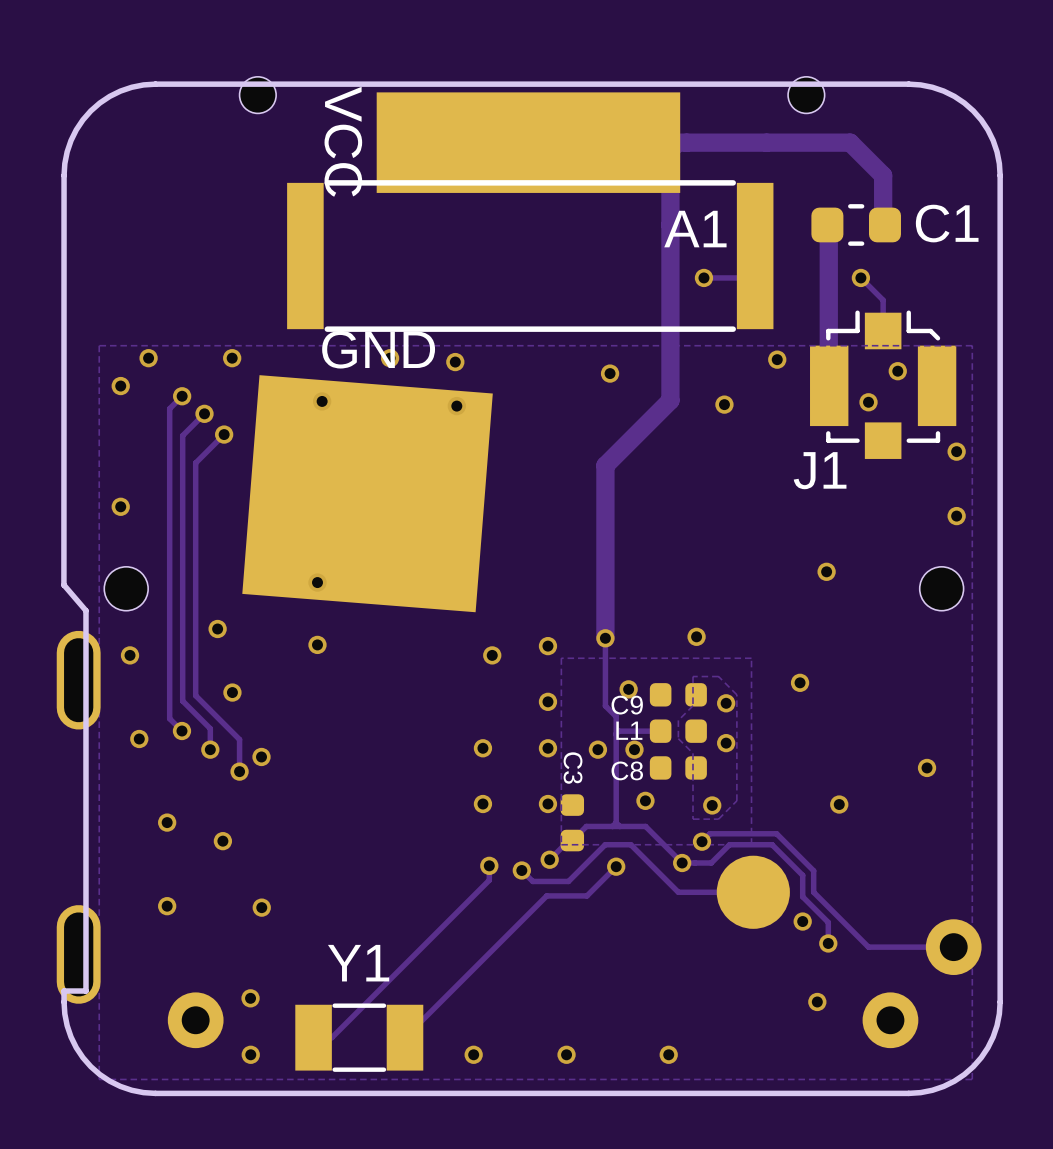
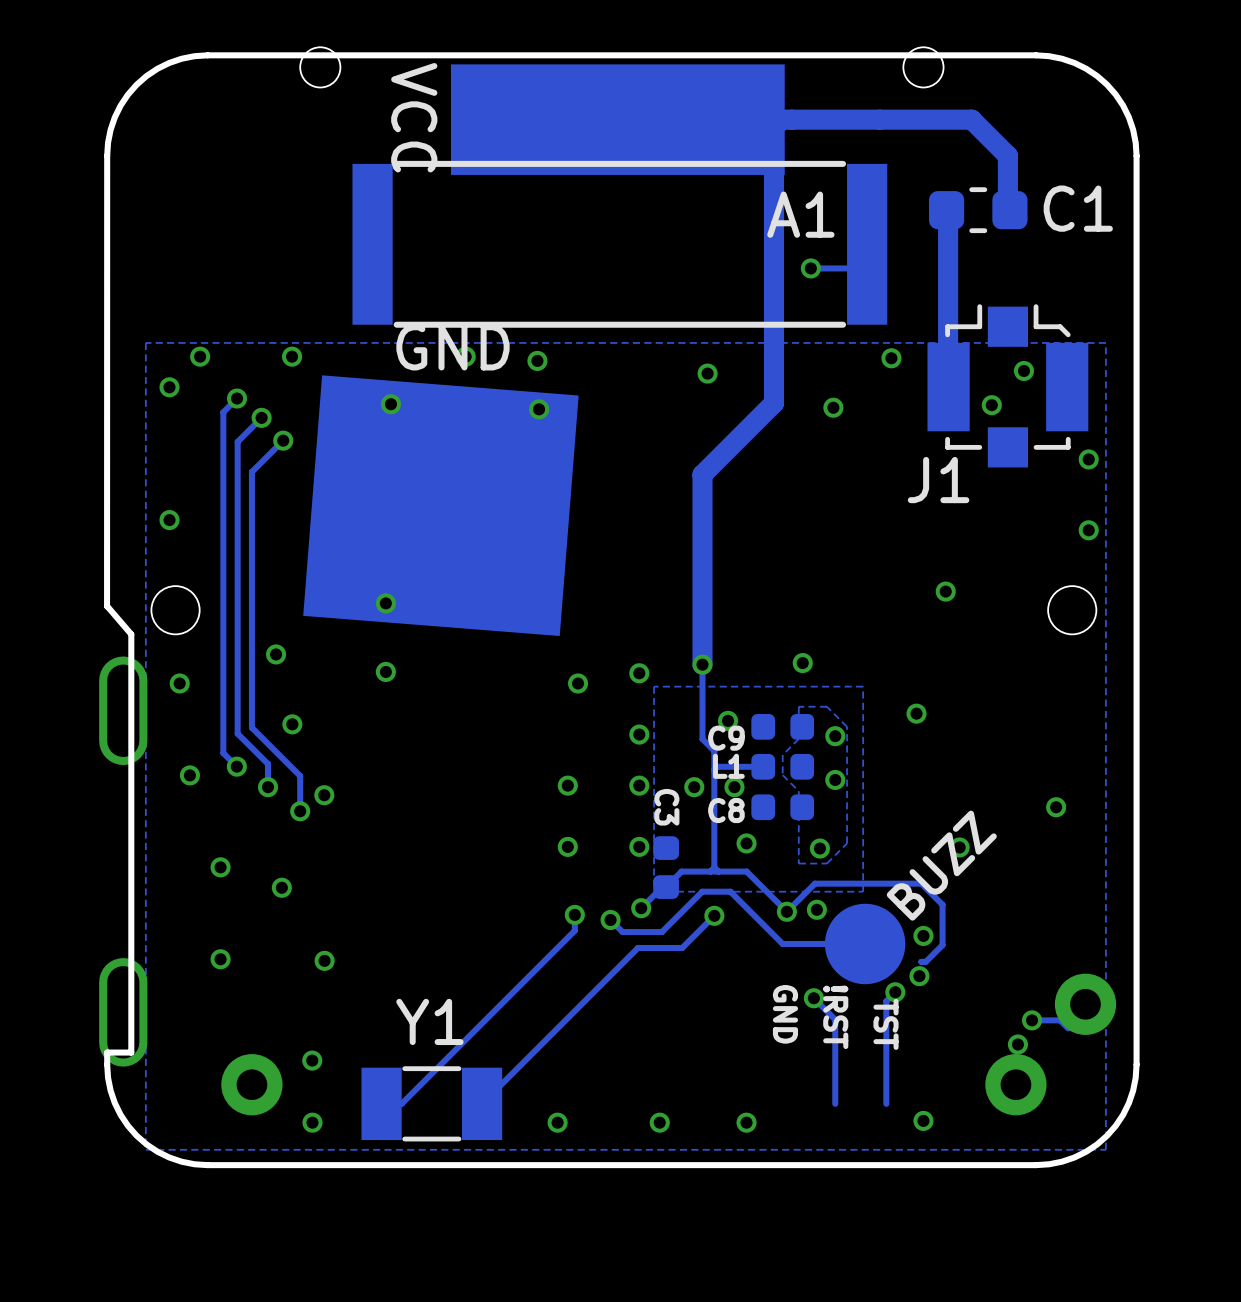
track: (860, 277) (883, 300) (883, 330) -> none
via: (860, 277) -> none
text: none -> BUZZ (941, 865)
track: (702, 841) (709, 833) (776, 833) (813, 870) (813, 892) (868, 947) (954, 947) -> none
via position: (702, 841) -> (816, 909)
track: (682, 863) (711, 863) (729, 844) (772, 844) (802, 875) (802, 896) (828, 922) (828, 943) -> (786, 911) (815, 883) (921, 883) (942, 904) (942, 945) (925, 961) (921, 961)
via: none -> (923, 935)
track: none -> (895, 992) (886, 1001) (886, 1103)
via: none -> (895, 992)
track: none -> (813, 998) (835, 1019) (835, 1103)
via: none -> (813, 998)
via: (828, 943) -> none
text: none -> GND (785, 1014)
text: none -> !RST (835, 1017)
track: none -> (1032, 1020) (1060, 1020) (1068, 1028)
via: none -> (1032, 1020)
text: none -> TST (886, 1024)
via: none -> (1017, 1044)
via: (817, 1001) -> none
via: none -> (923, 1120)
via position: (668, 1054) -> (746, 1122)

